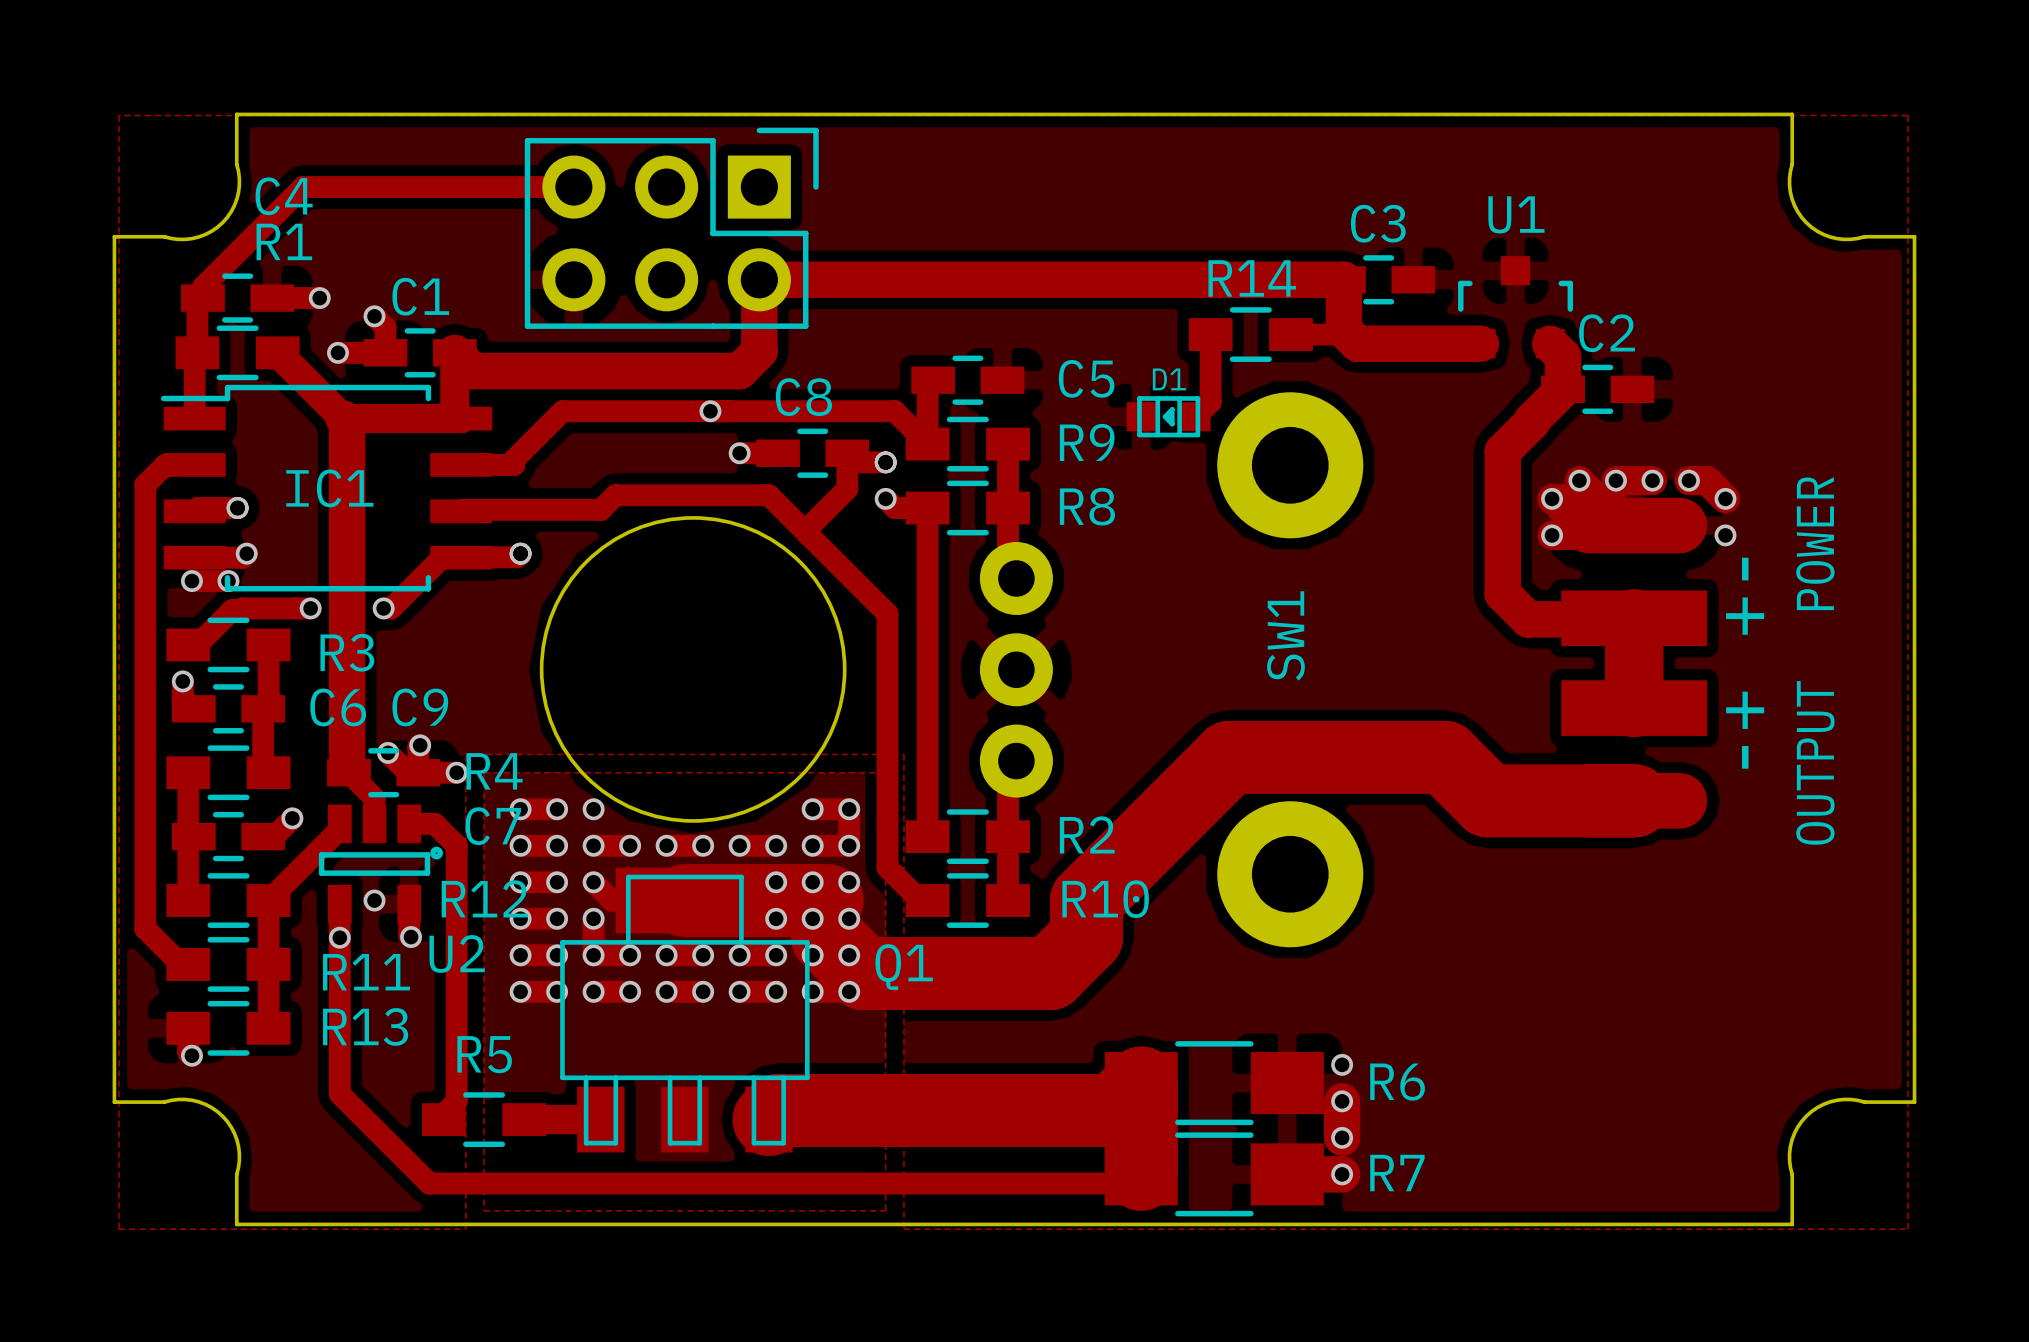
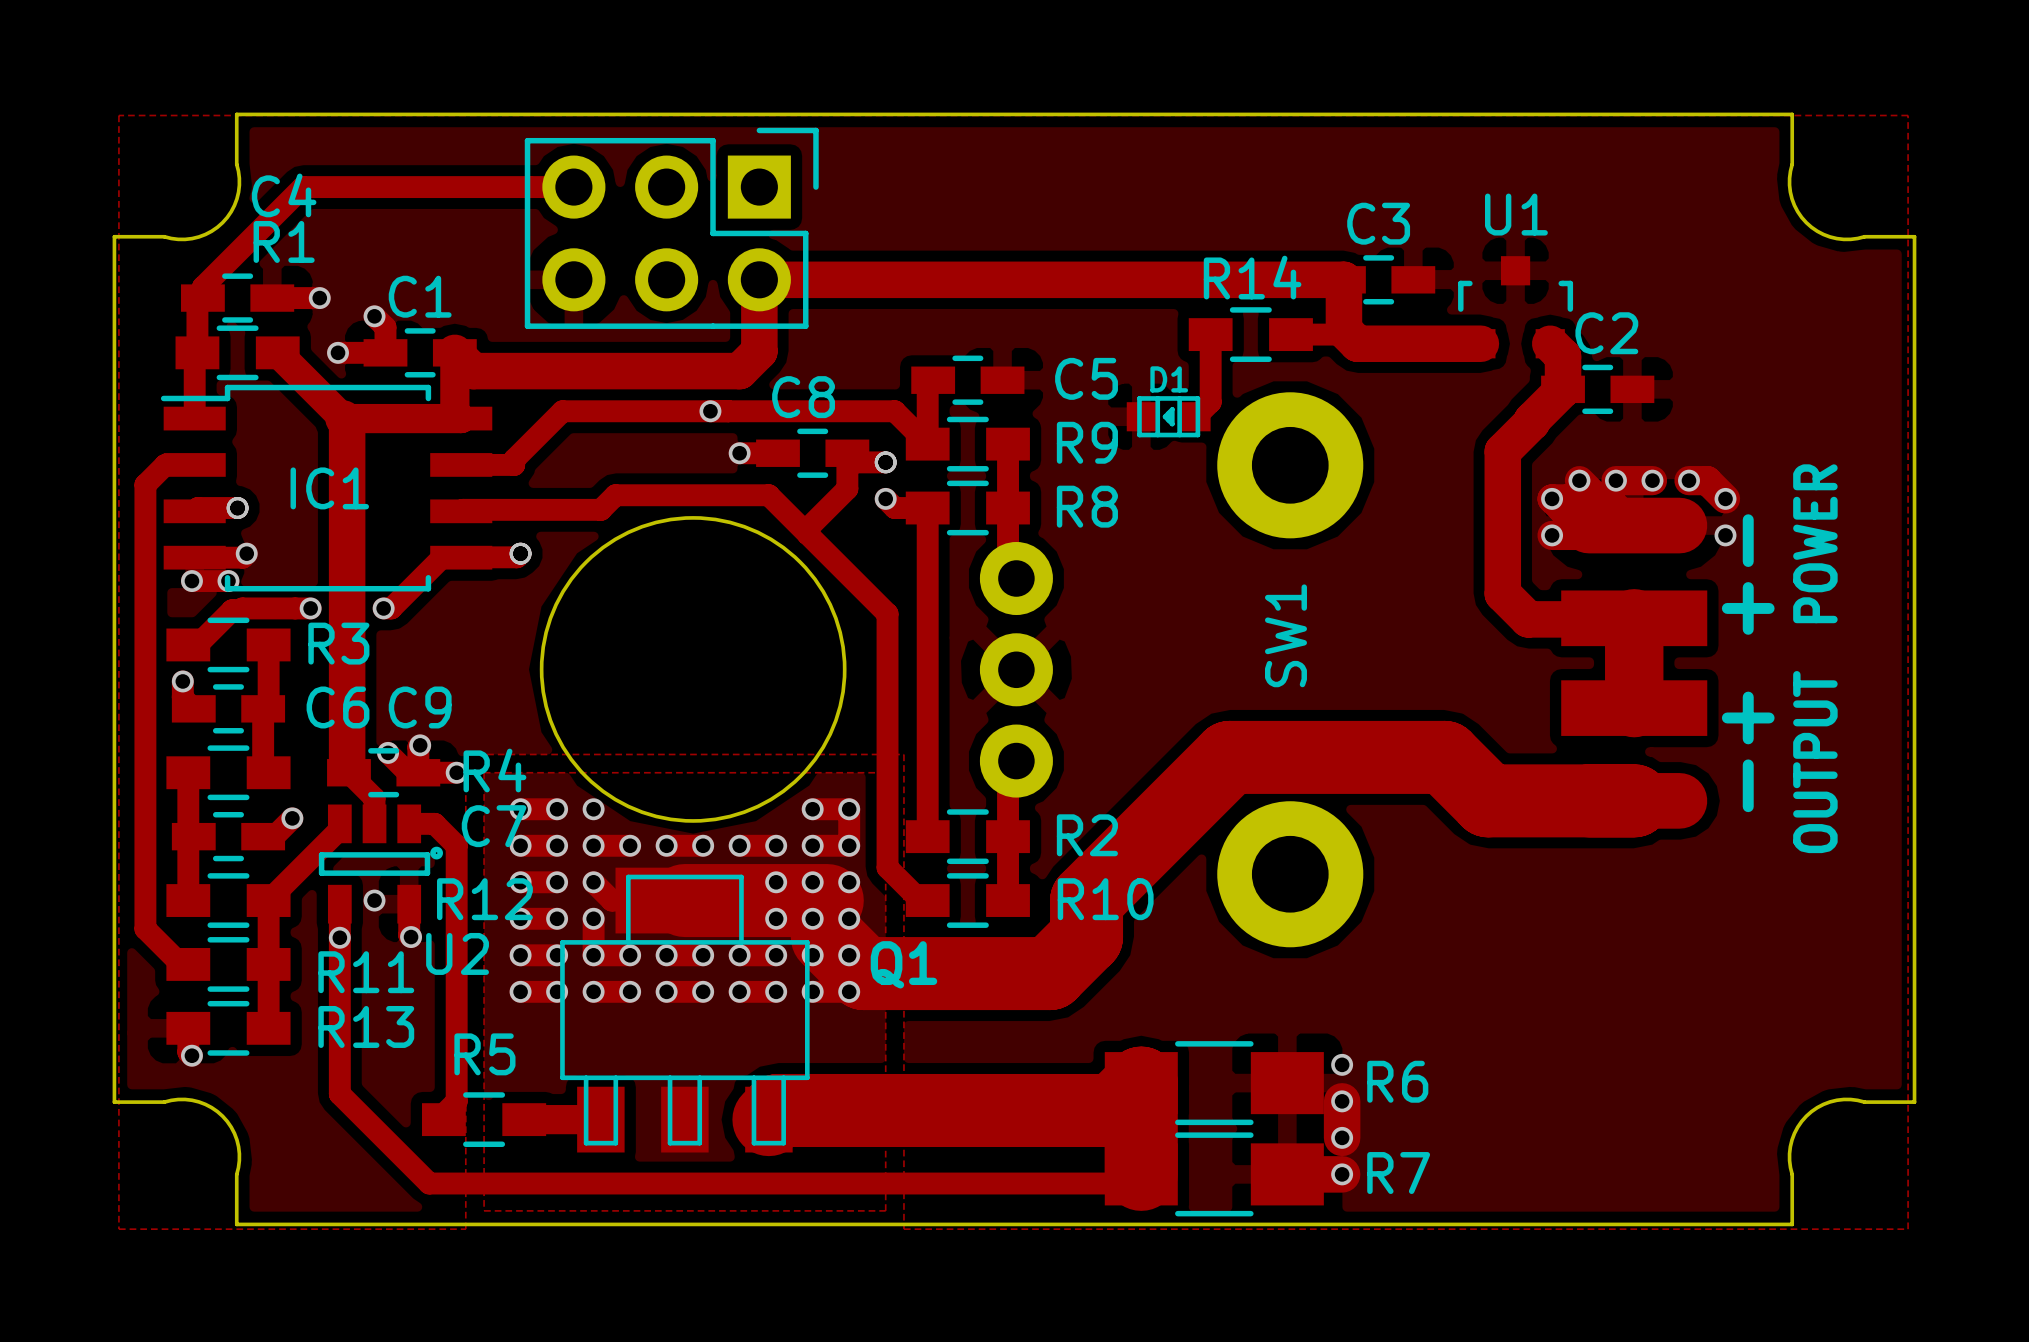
R3 name position: R3 (347, 652) -> R3 (338, 643)

